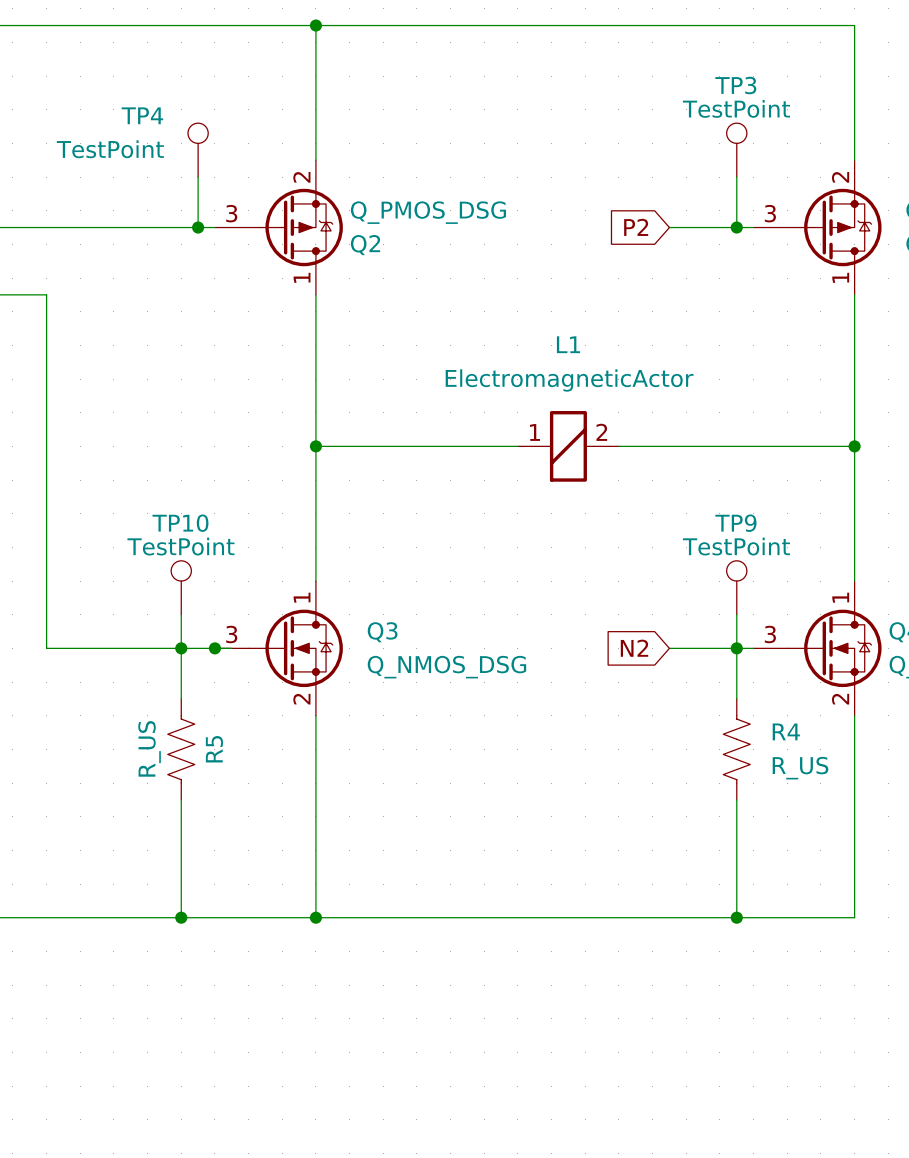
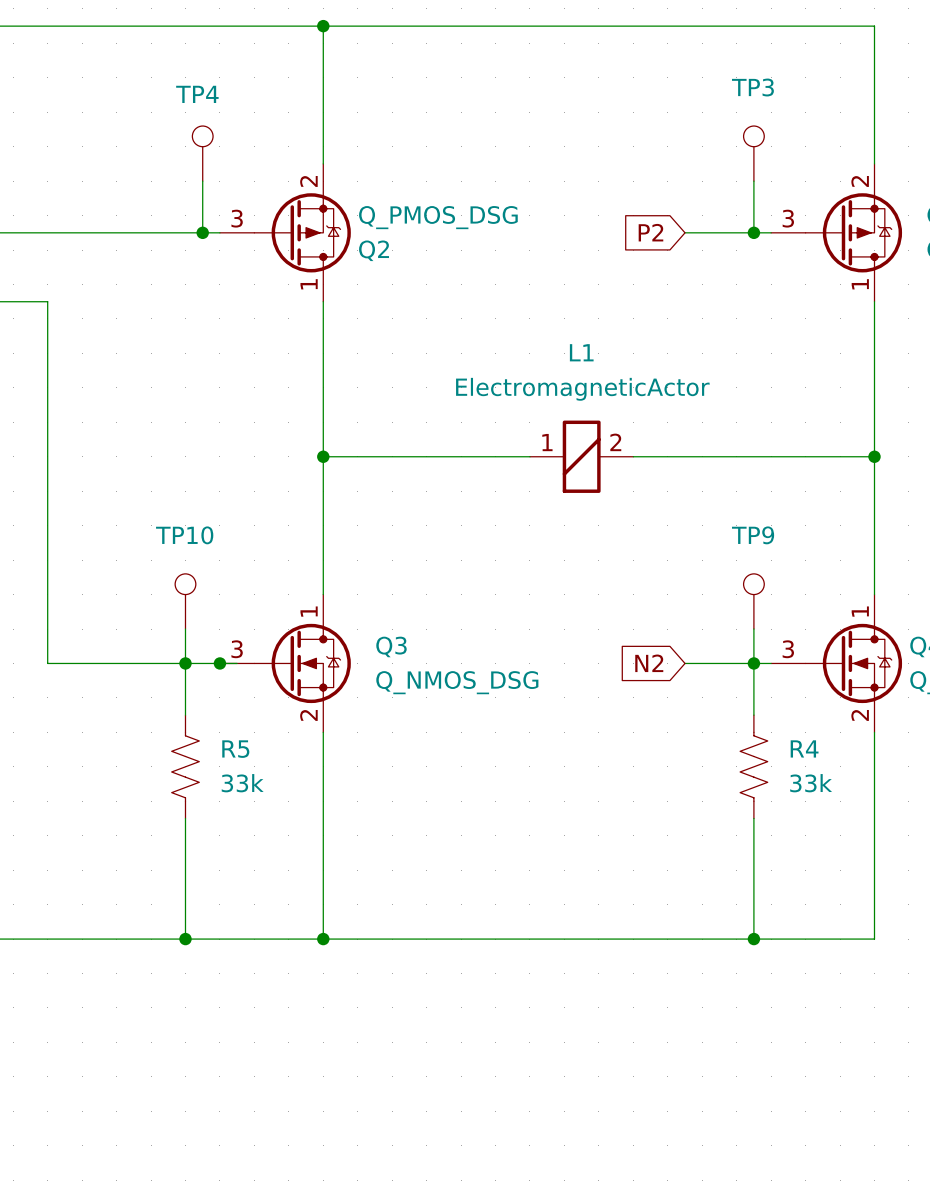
TP3 value: TestPoint (736, 108) -> none
TP4 name position: TP4 (142, 115) -> TP4 (197, 94)
TP4 value: TestPoint (110, 149) -> none
TP10 value: TestPoint (180, 546) -> none
TP9 value: TestPoint (736, 546) -> none
R5 value: R_US (149, 748) -> 33k (242, 783)
R5 name rotation: 0° (214, 749) -> 90° clockwise (235, 749)
R4 value: R_US (800, 768) -> 33k (811, 783)

